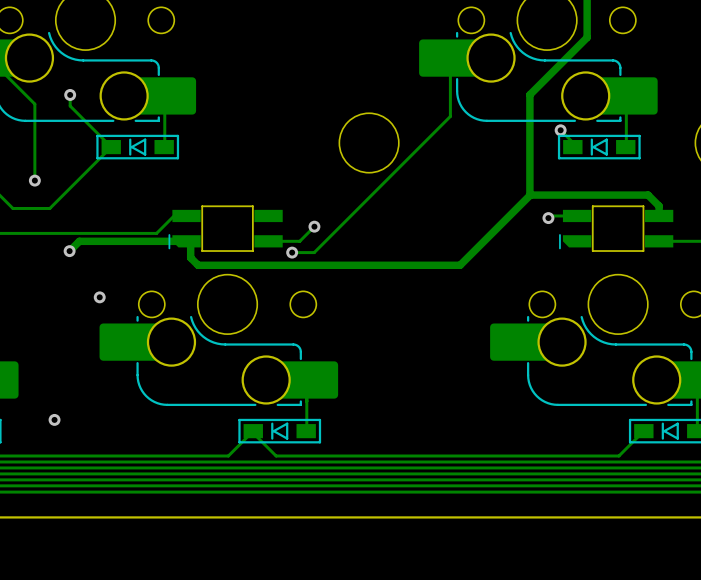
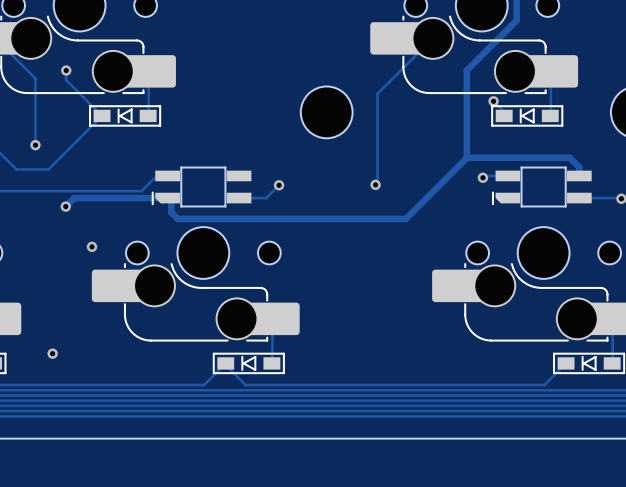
track: (491, 58) (450, 58) (450, 116) (314, 252) (292, 252) -> (432, 38) (377, 93) (377, 182) (375, 184)
via: none -> (375, 184)
via: (292, 252) -> none

